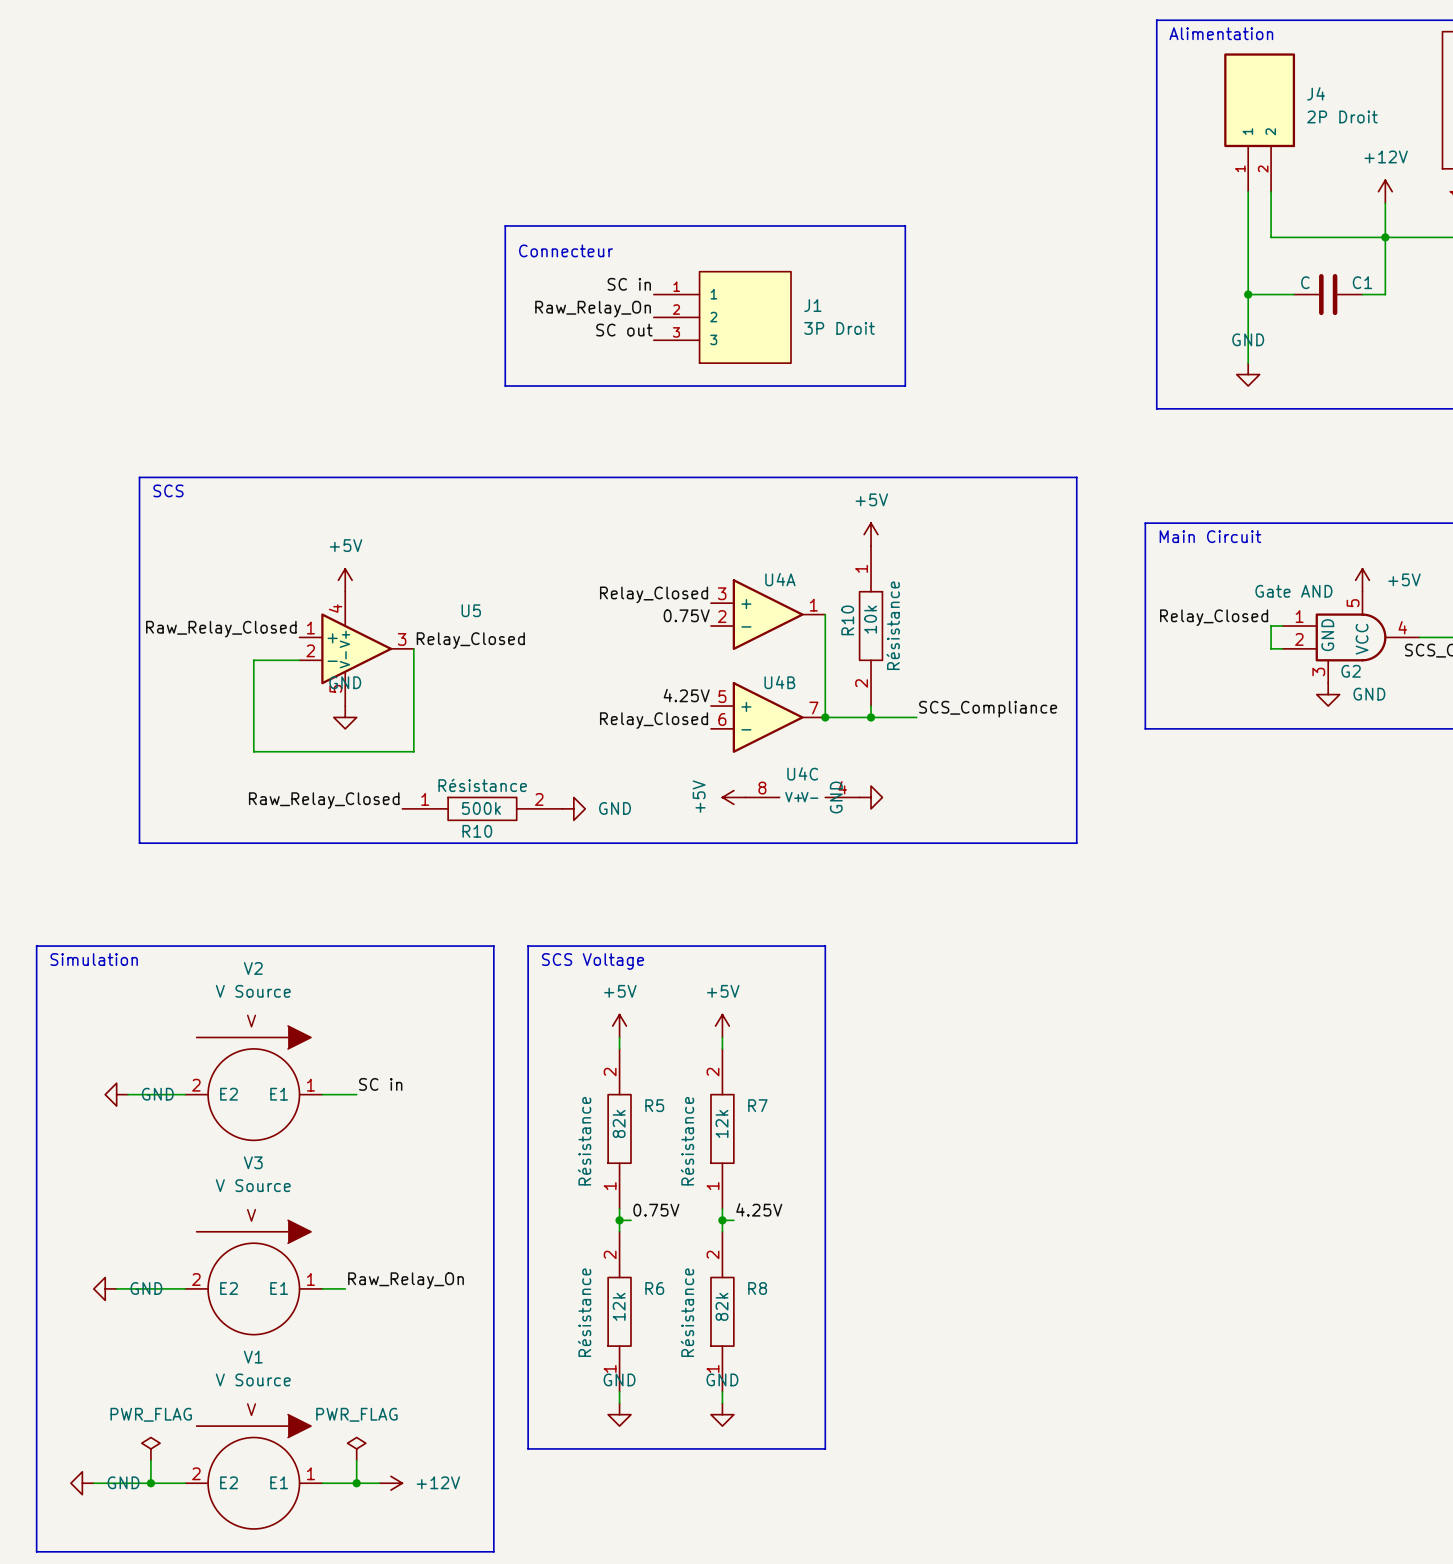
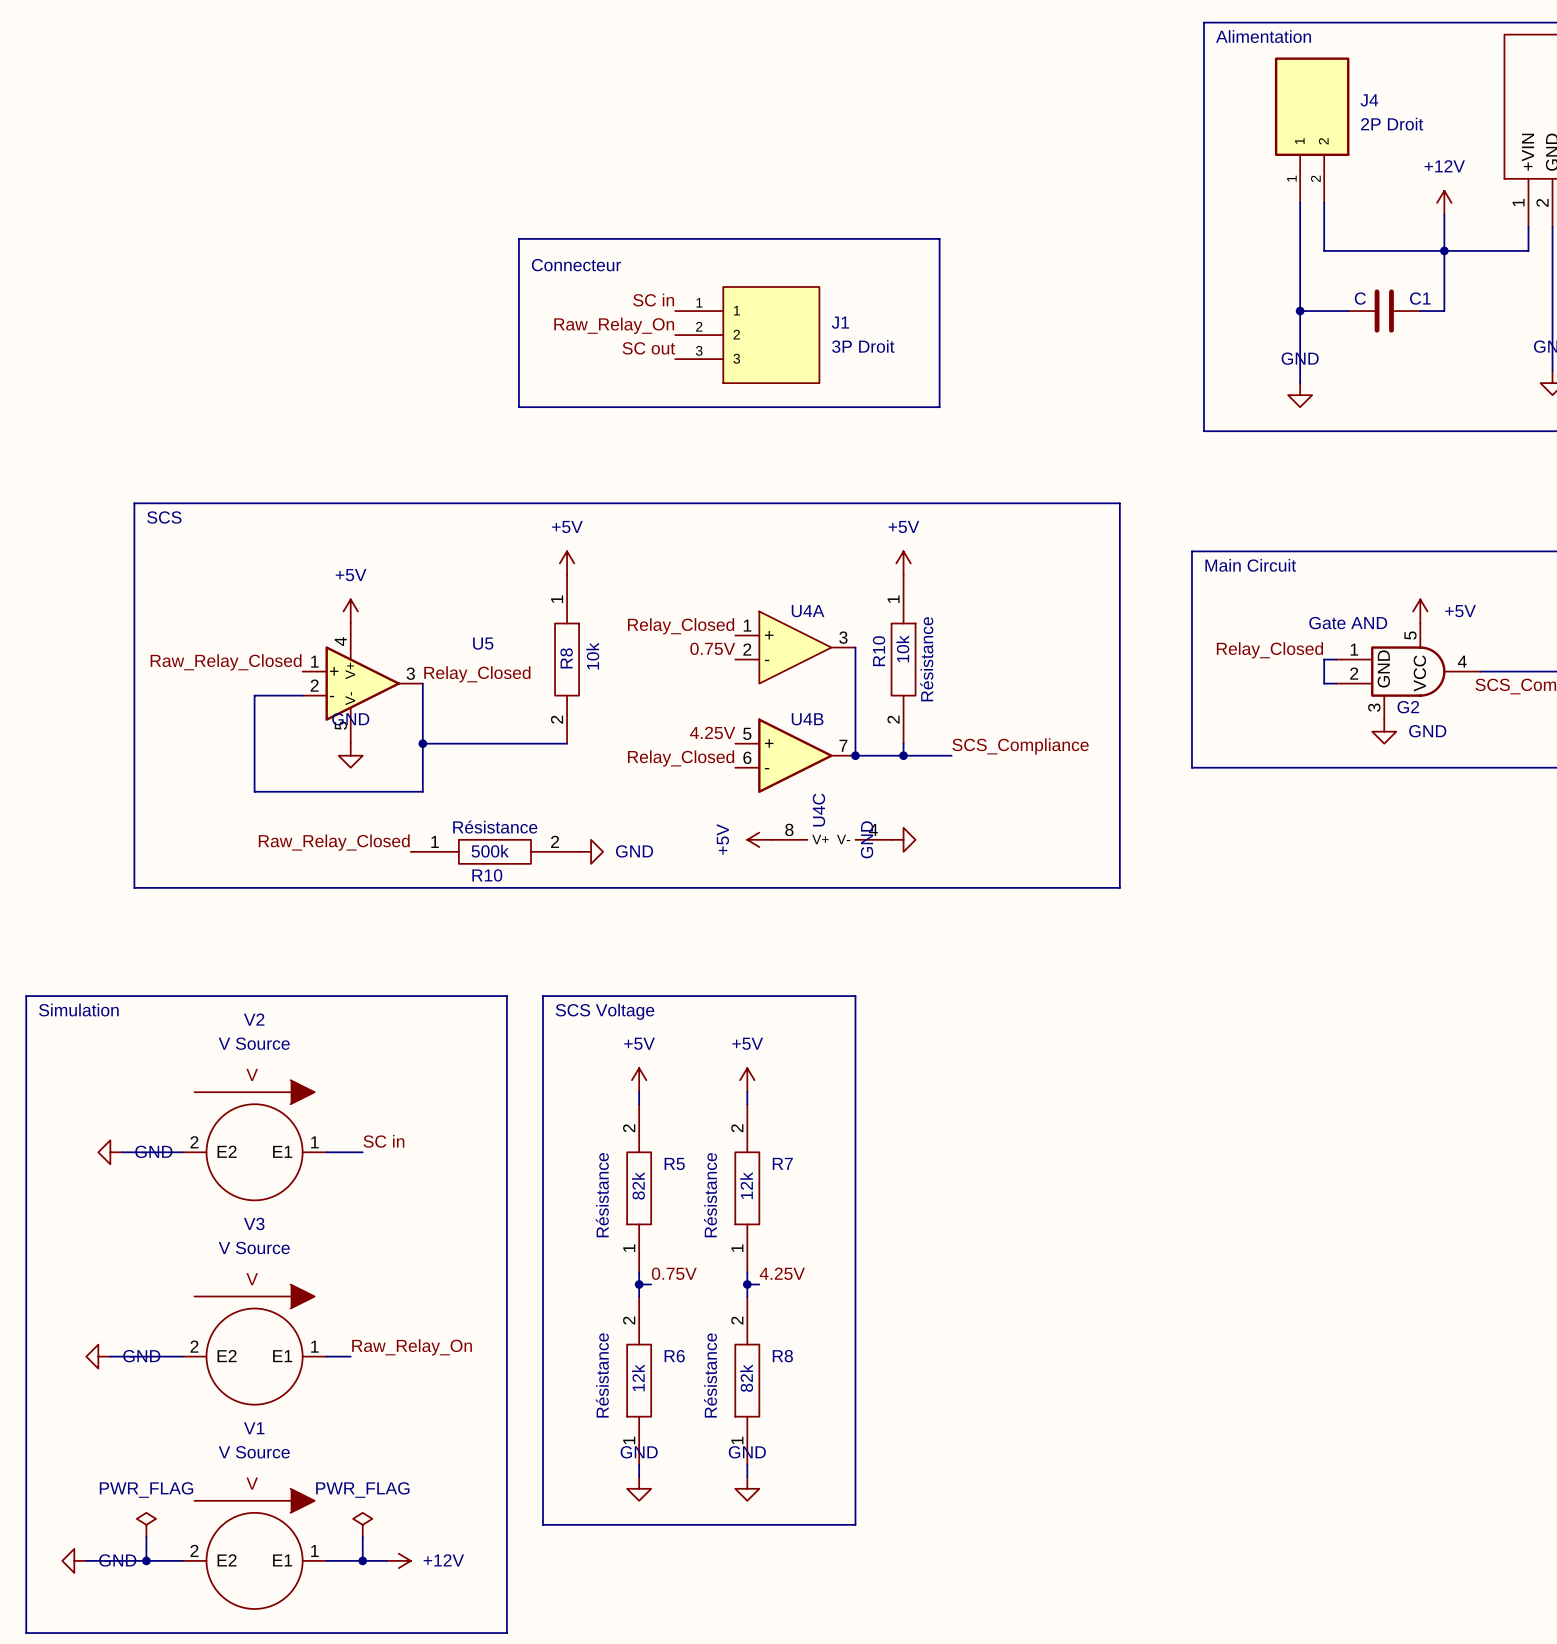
power symbol: none -> +5V (567, 563)
U4A symbol: [711, 579, 826, 651] -> [735, 611, 856, 684]
R8: none -> 10k (567, 659)
wire: none -> (422, 743) (567, 743)
junction: none -> (422, 743)
U4C name rotation: 0° (802, 773) -> 90° counterclockwise (818, 810)

